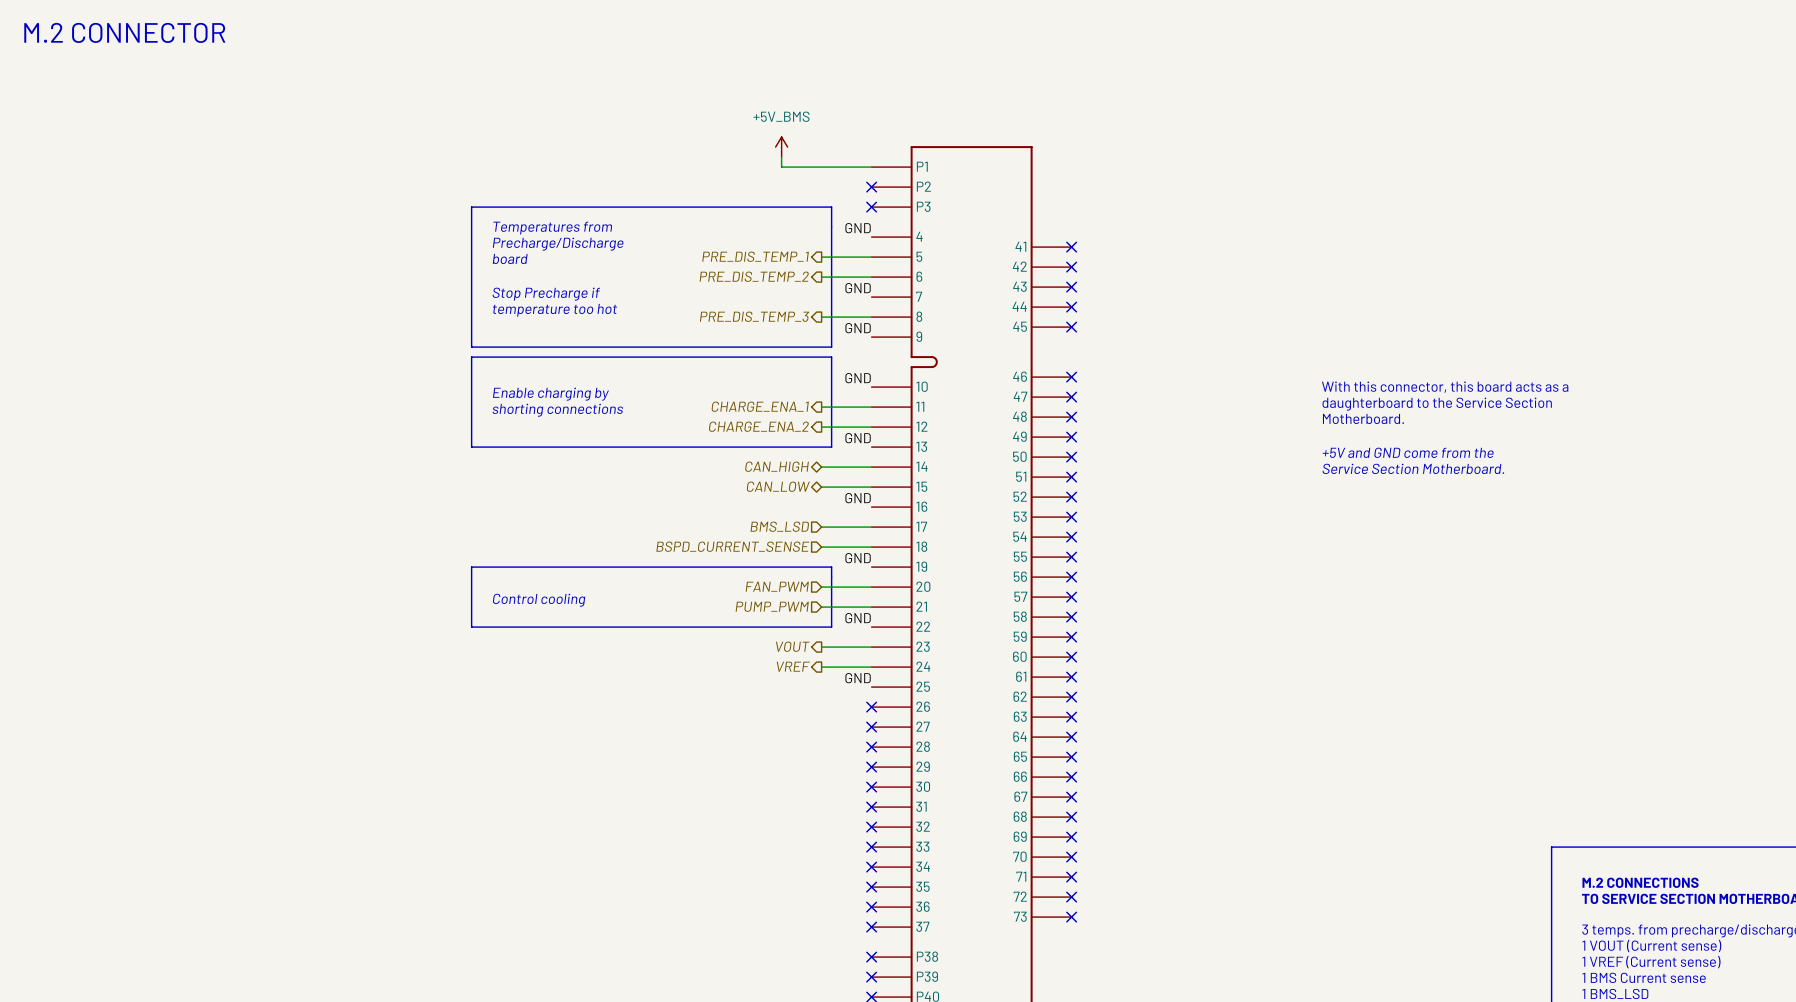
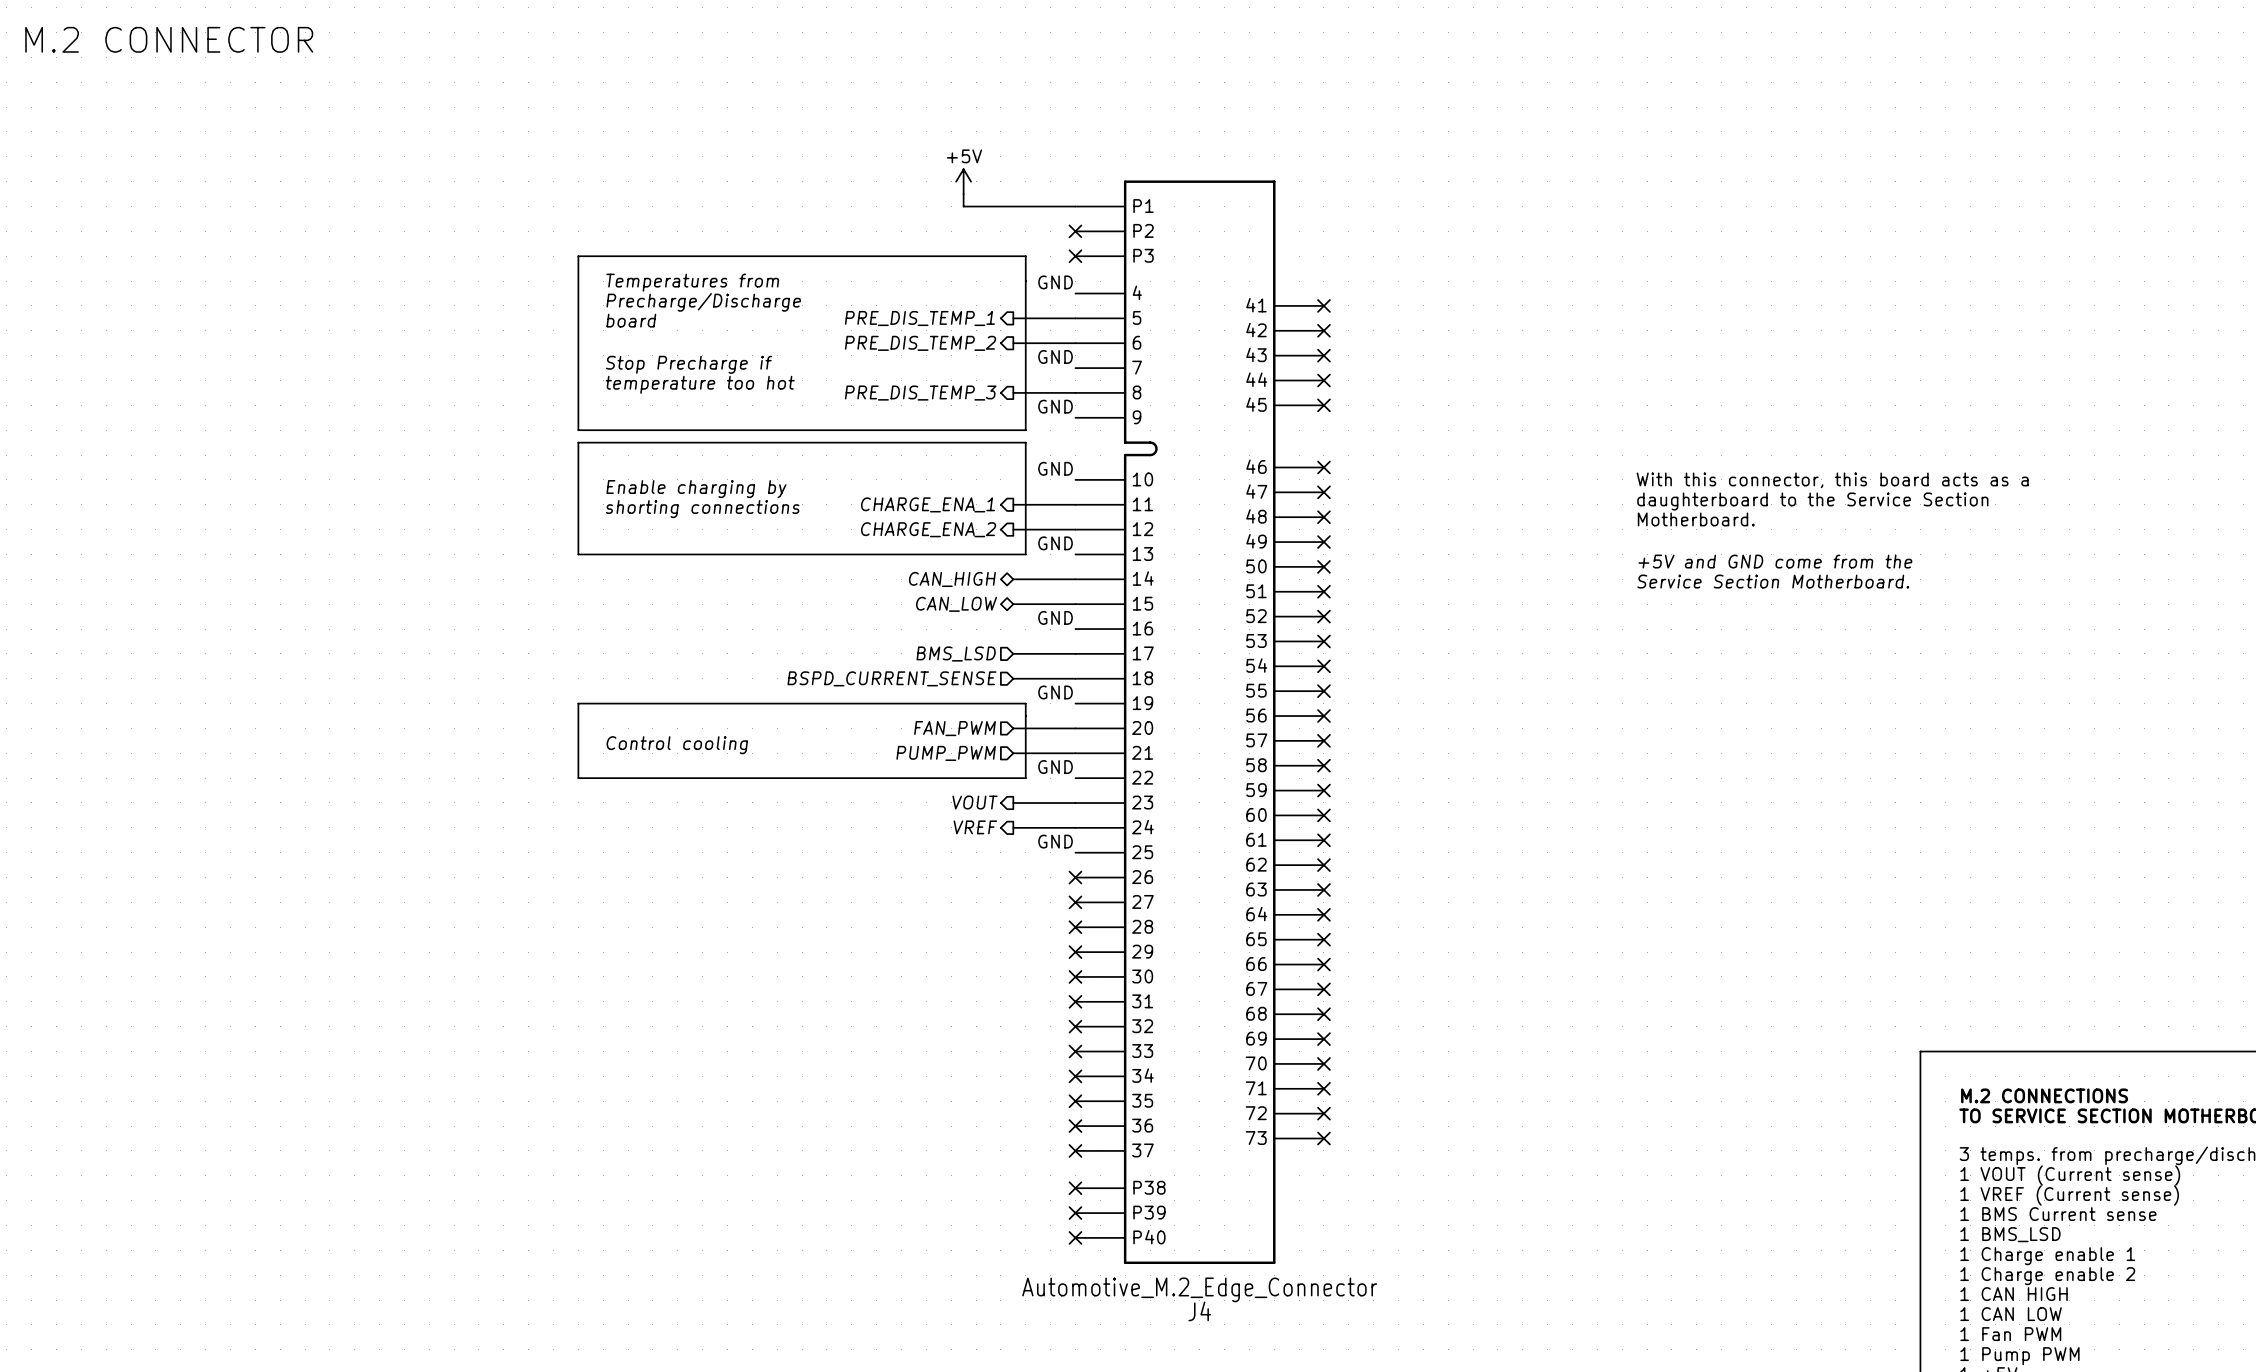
power symbol: +5V_BMS (781, 147) -> +5V (963, 181)

